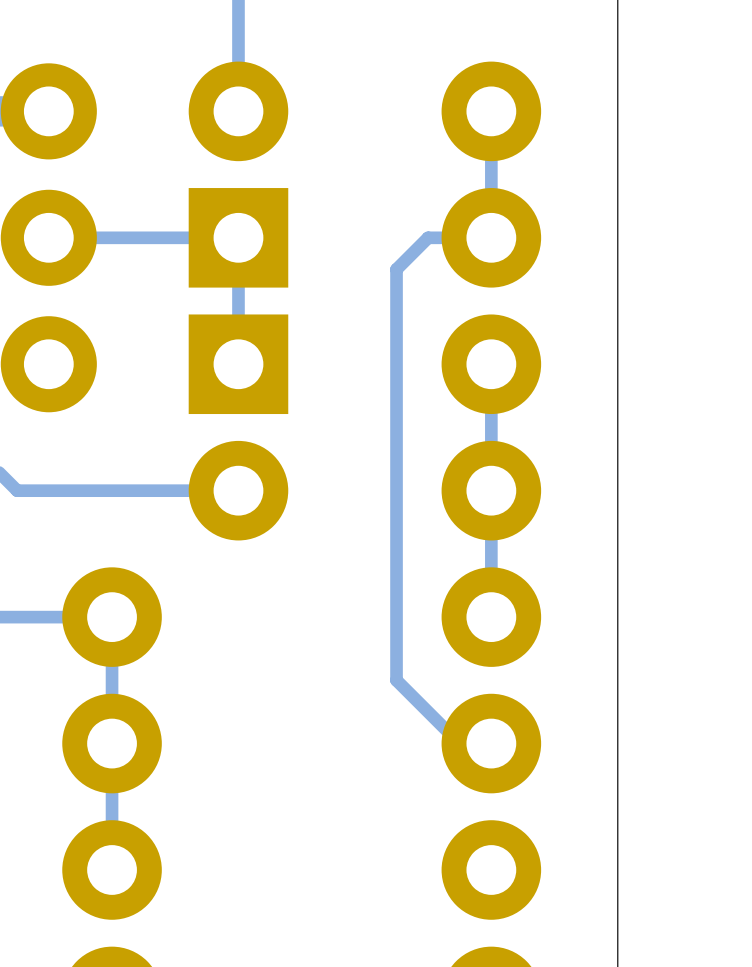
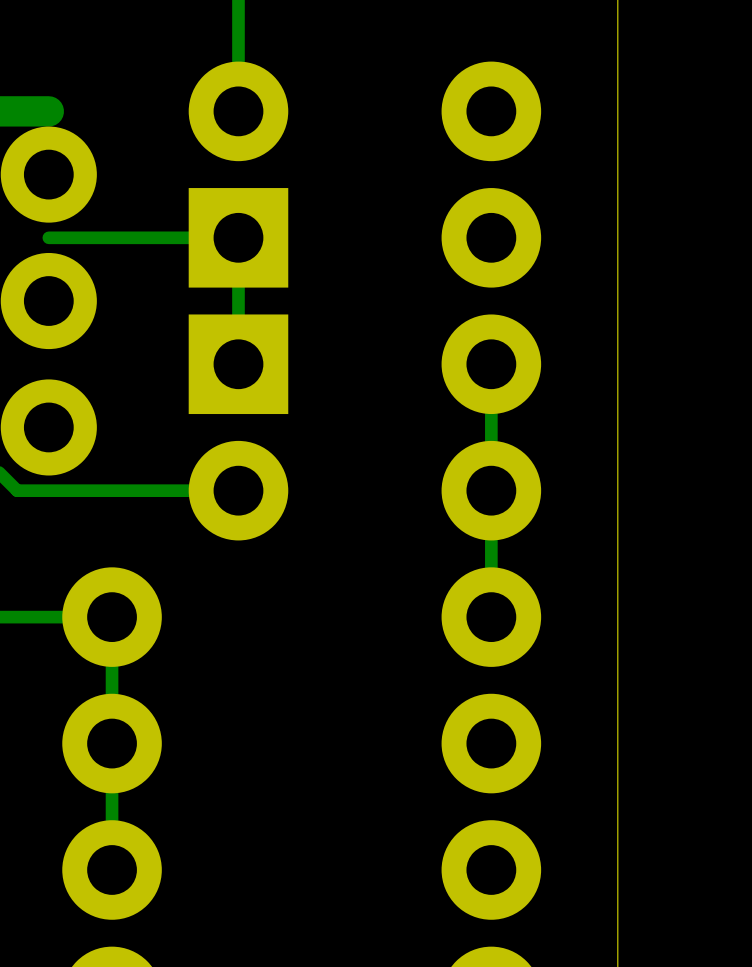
track: (491, 111) (491, 237) (428, 237) (396, 269) (396, 680) (459, 743) (491, 743) -> none
part position: (48, 237) -> (48, 301)

